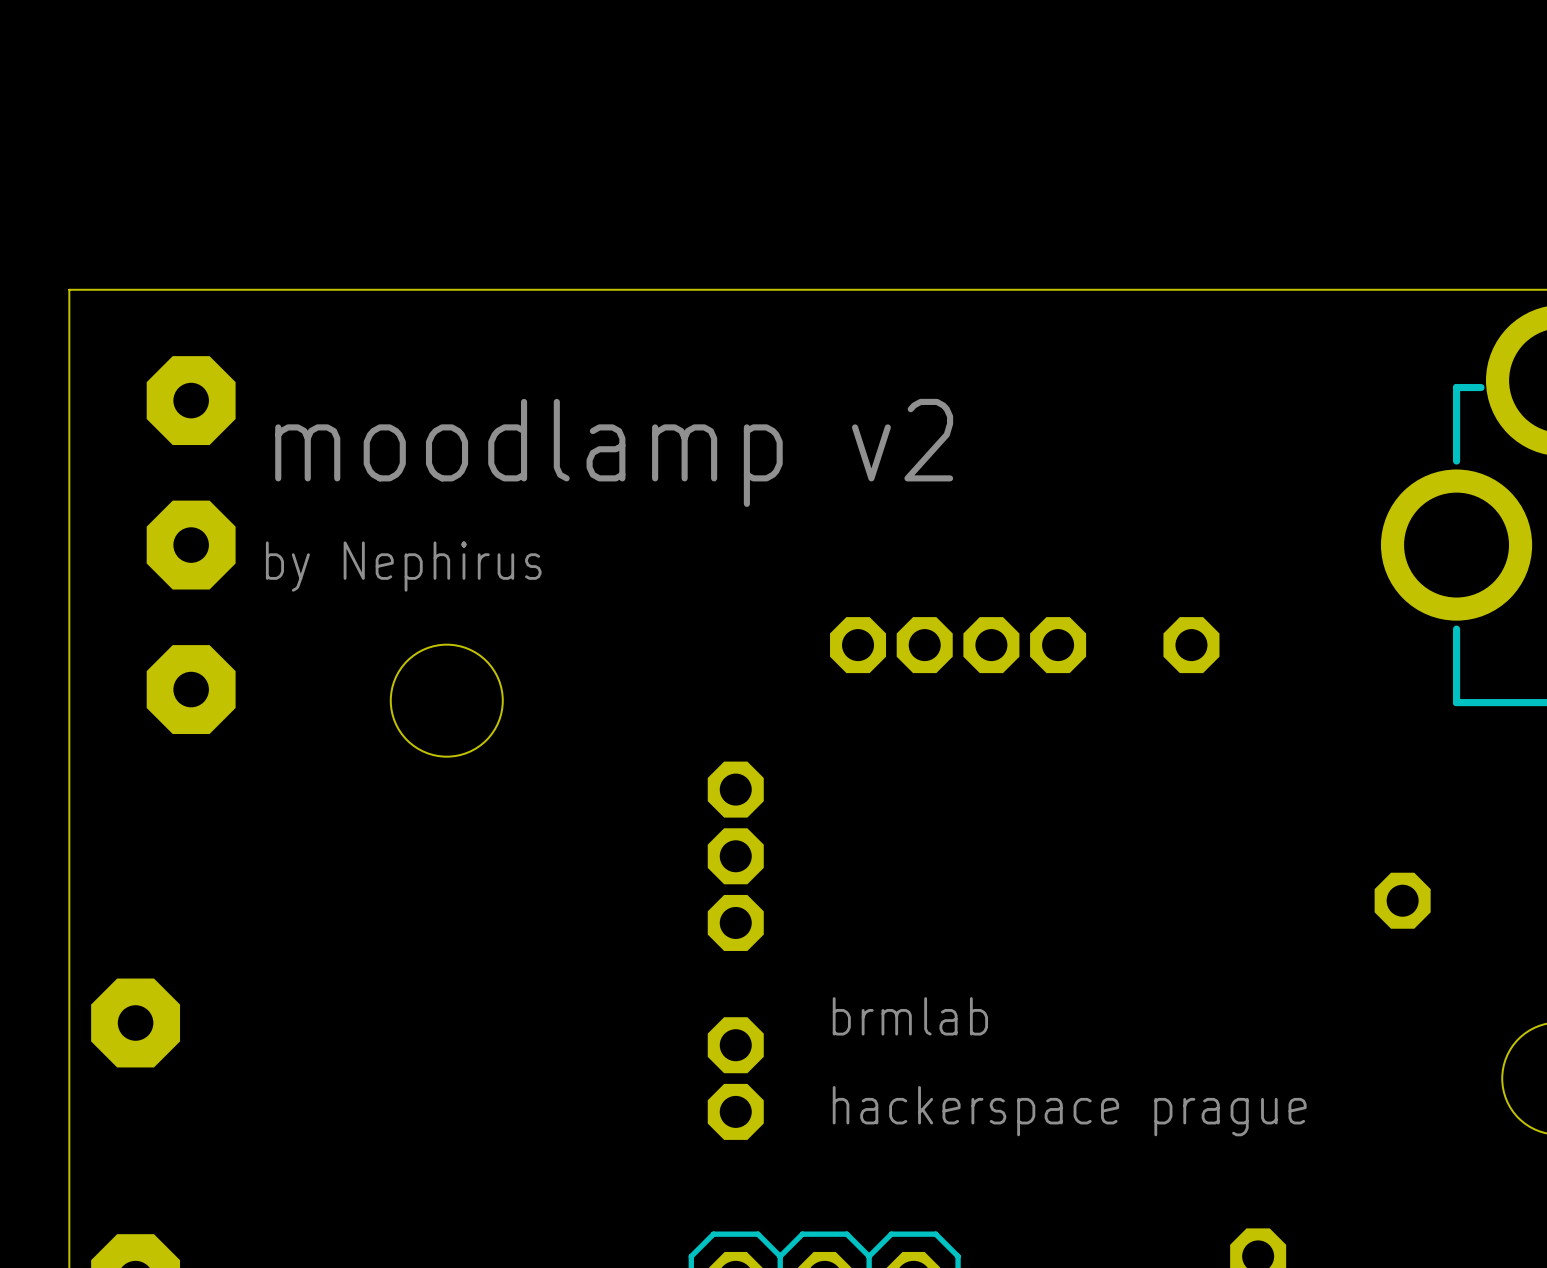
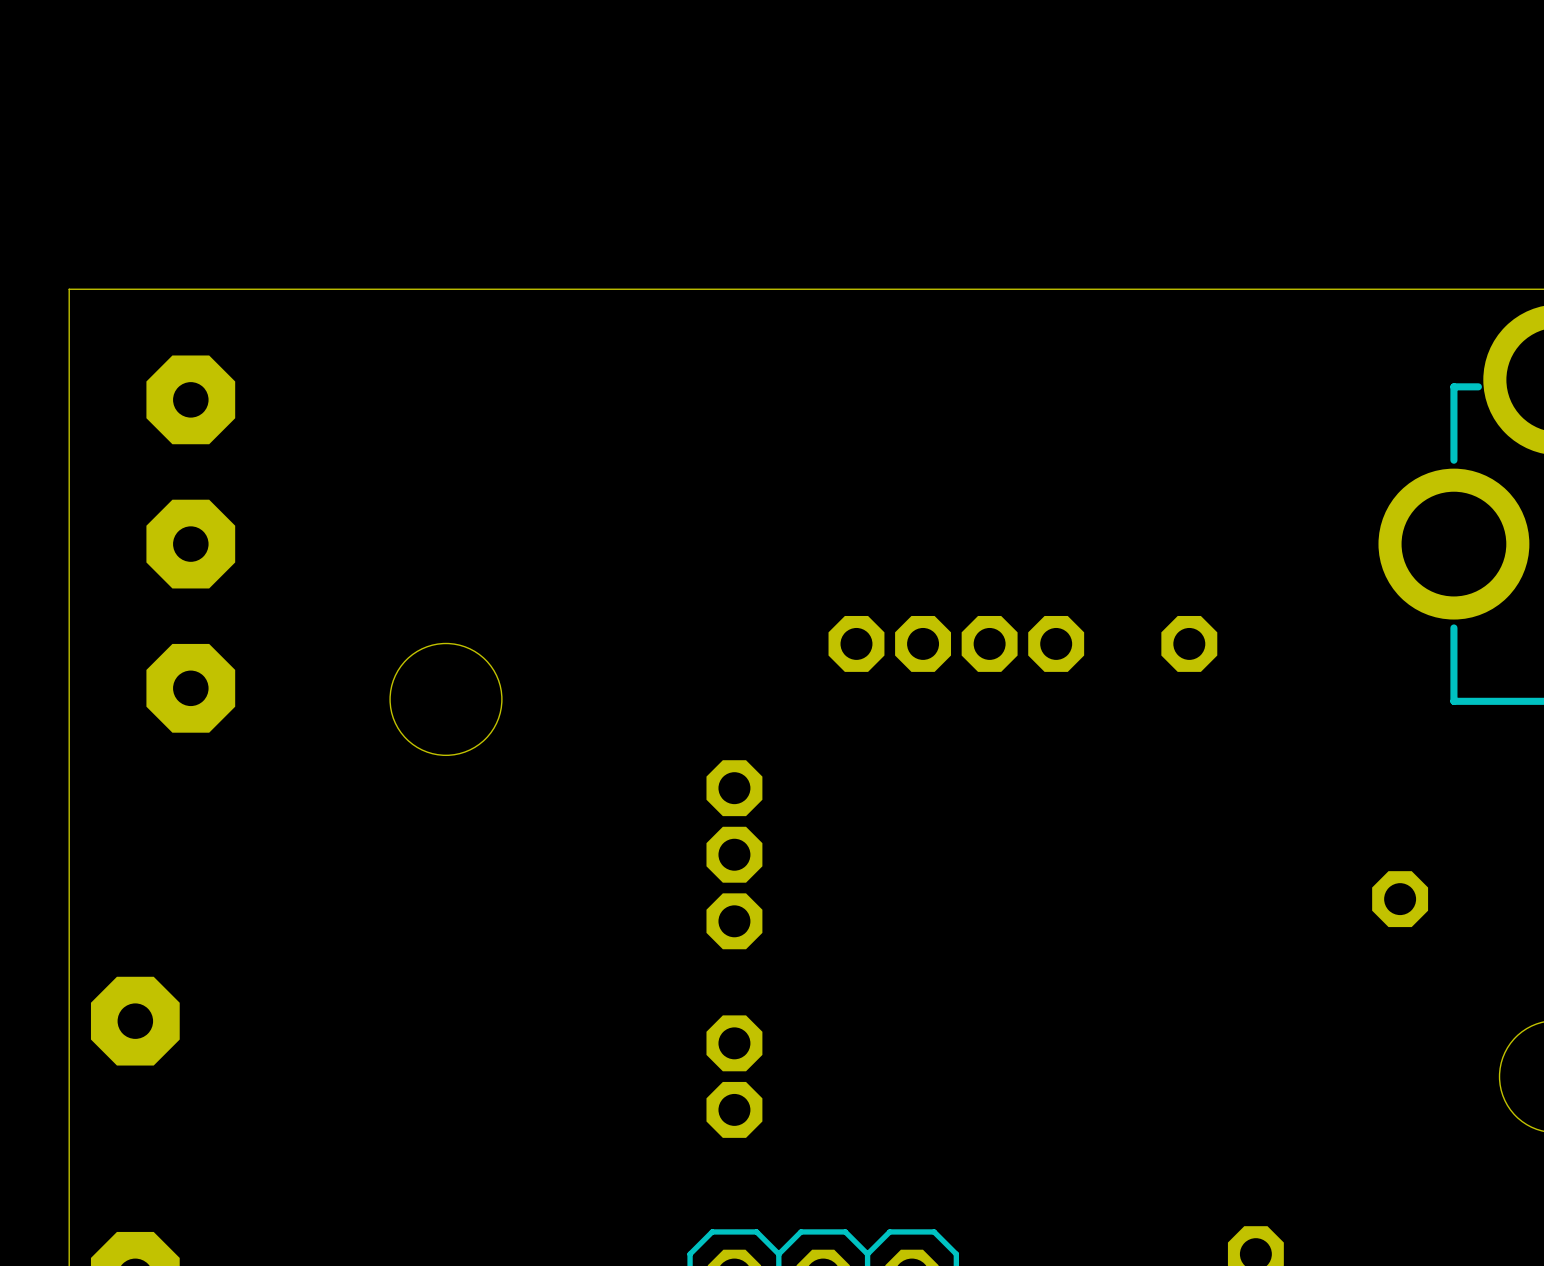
text: moodlamp v2 (614, 452) -> none
text: by Nephirus (403, 566) -> none
text: brmlab (910, 1016) -> none
text: hackerspace prague (1069, 1111) -> none

